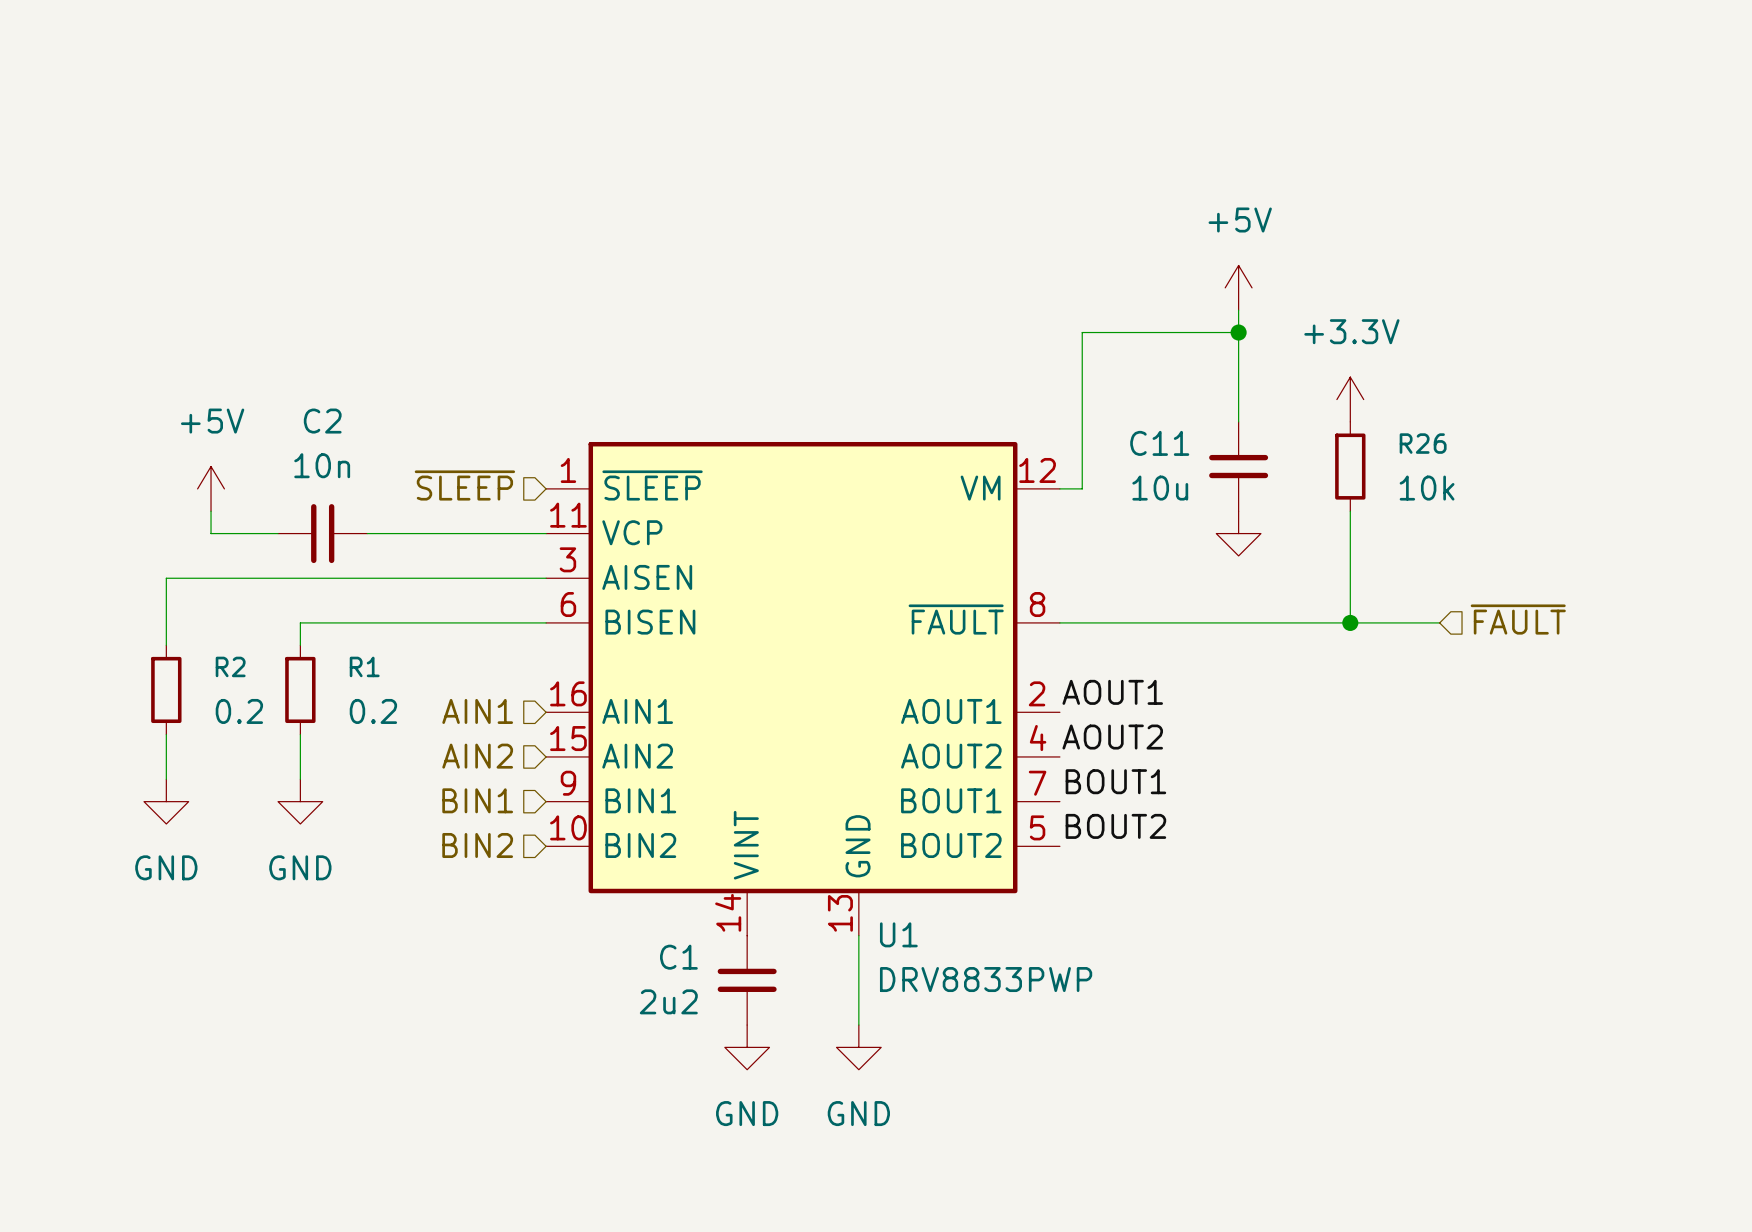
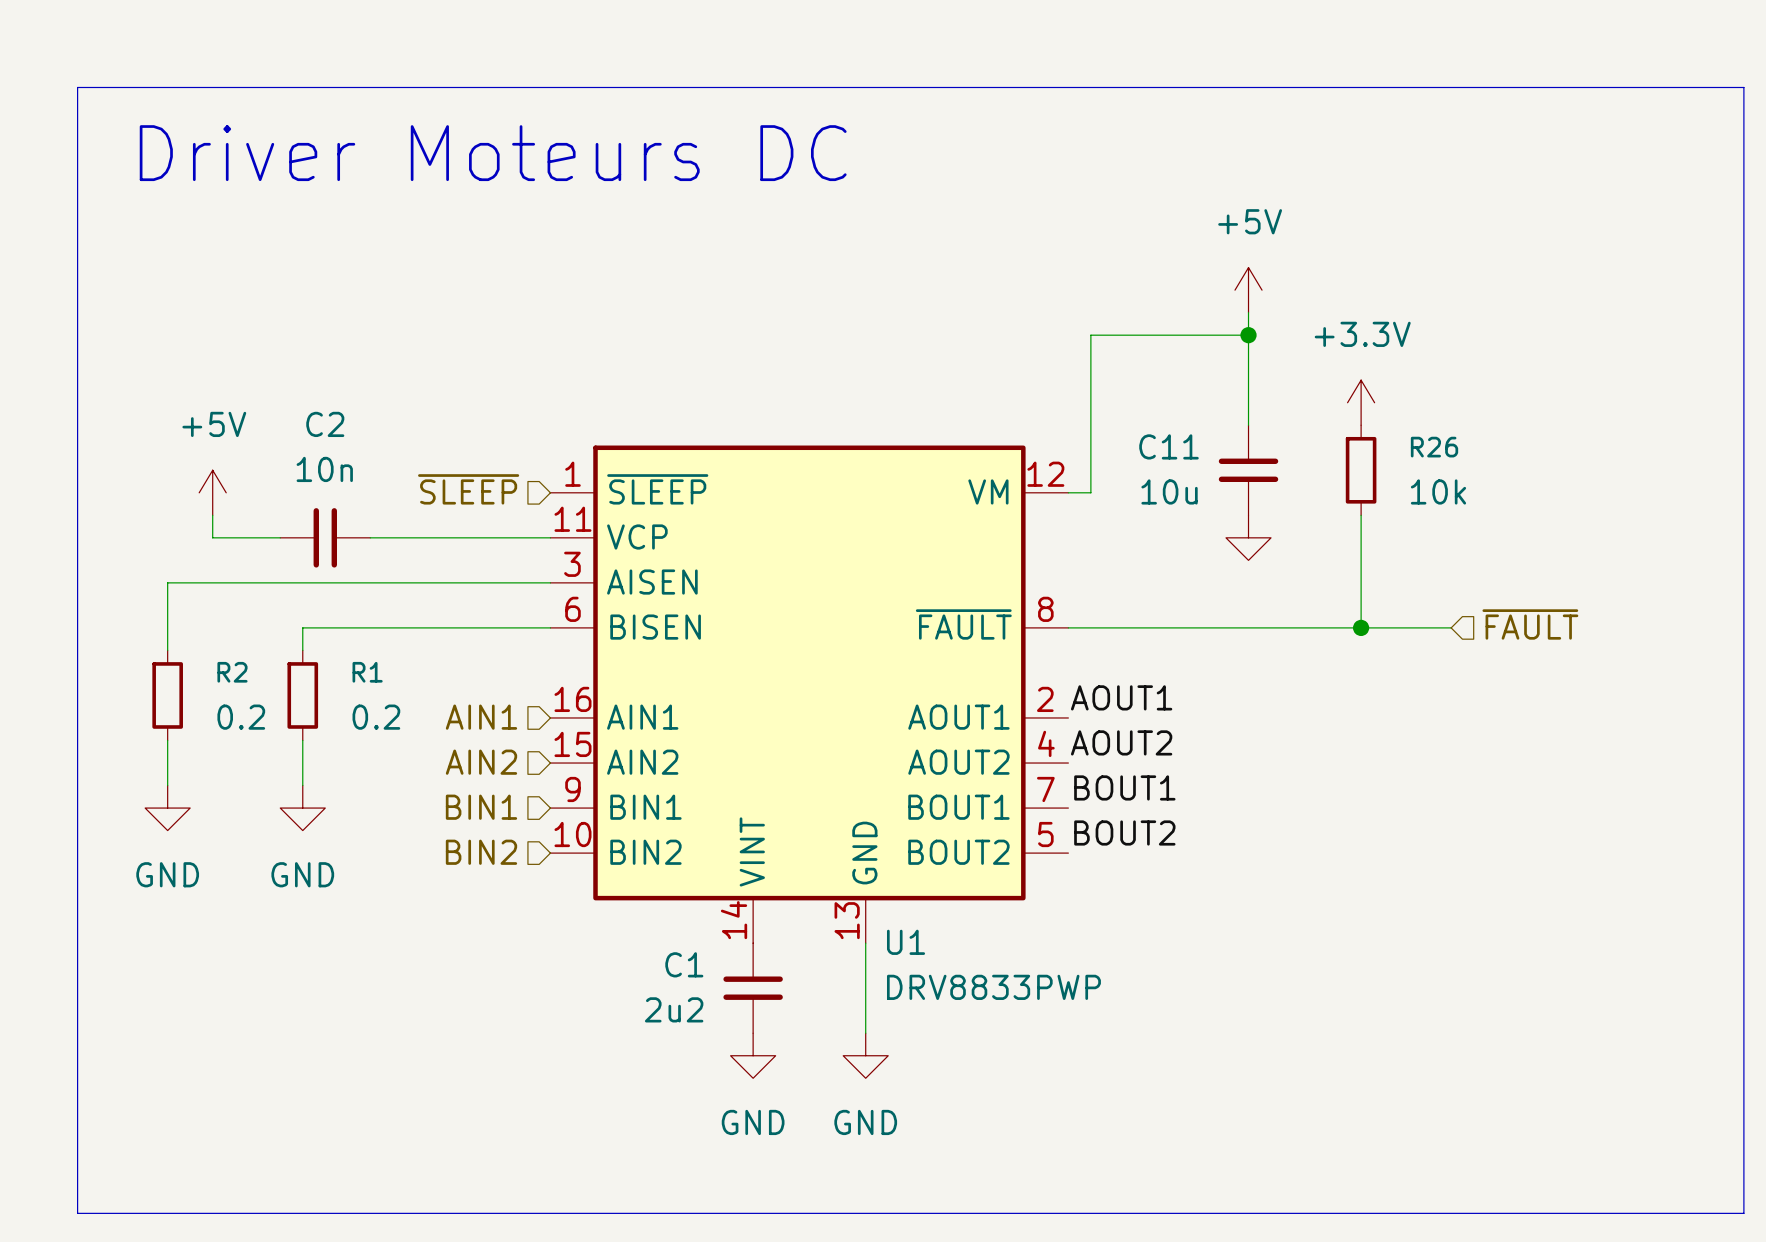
line: none -> (77, 87) (1743, 87) (1743, 1213) (77, 1213) (77, 87)
text: none -> Driver Moteurs DC (493, 153)

